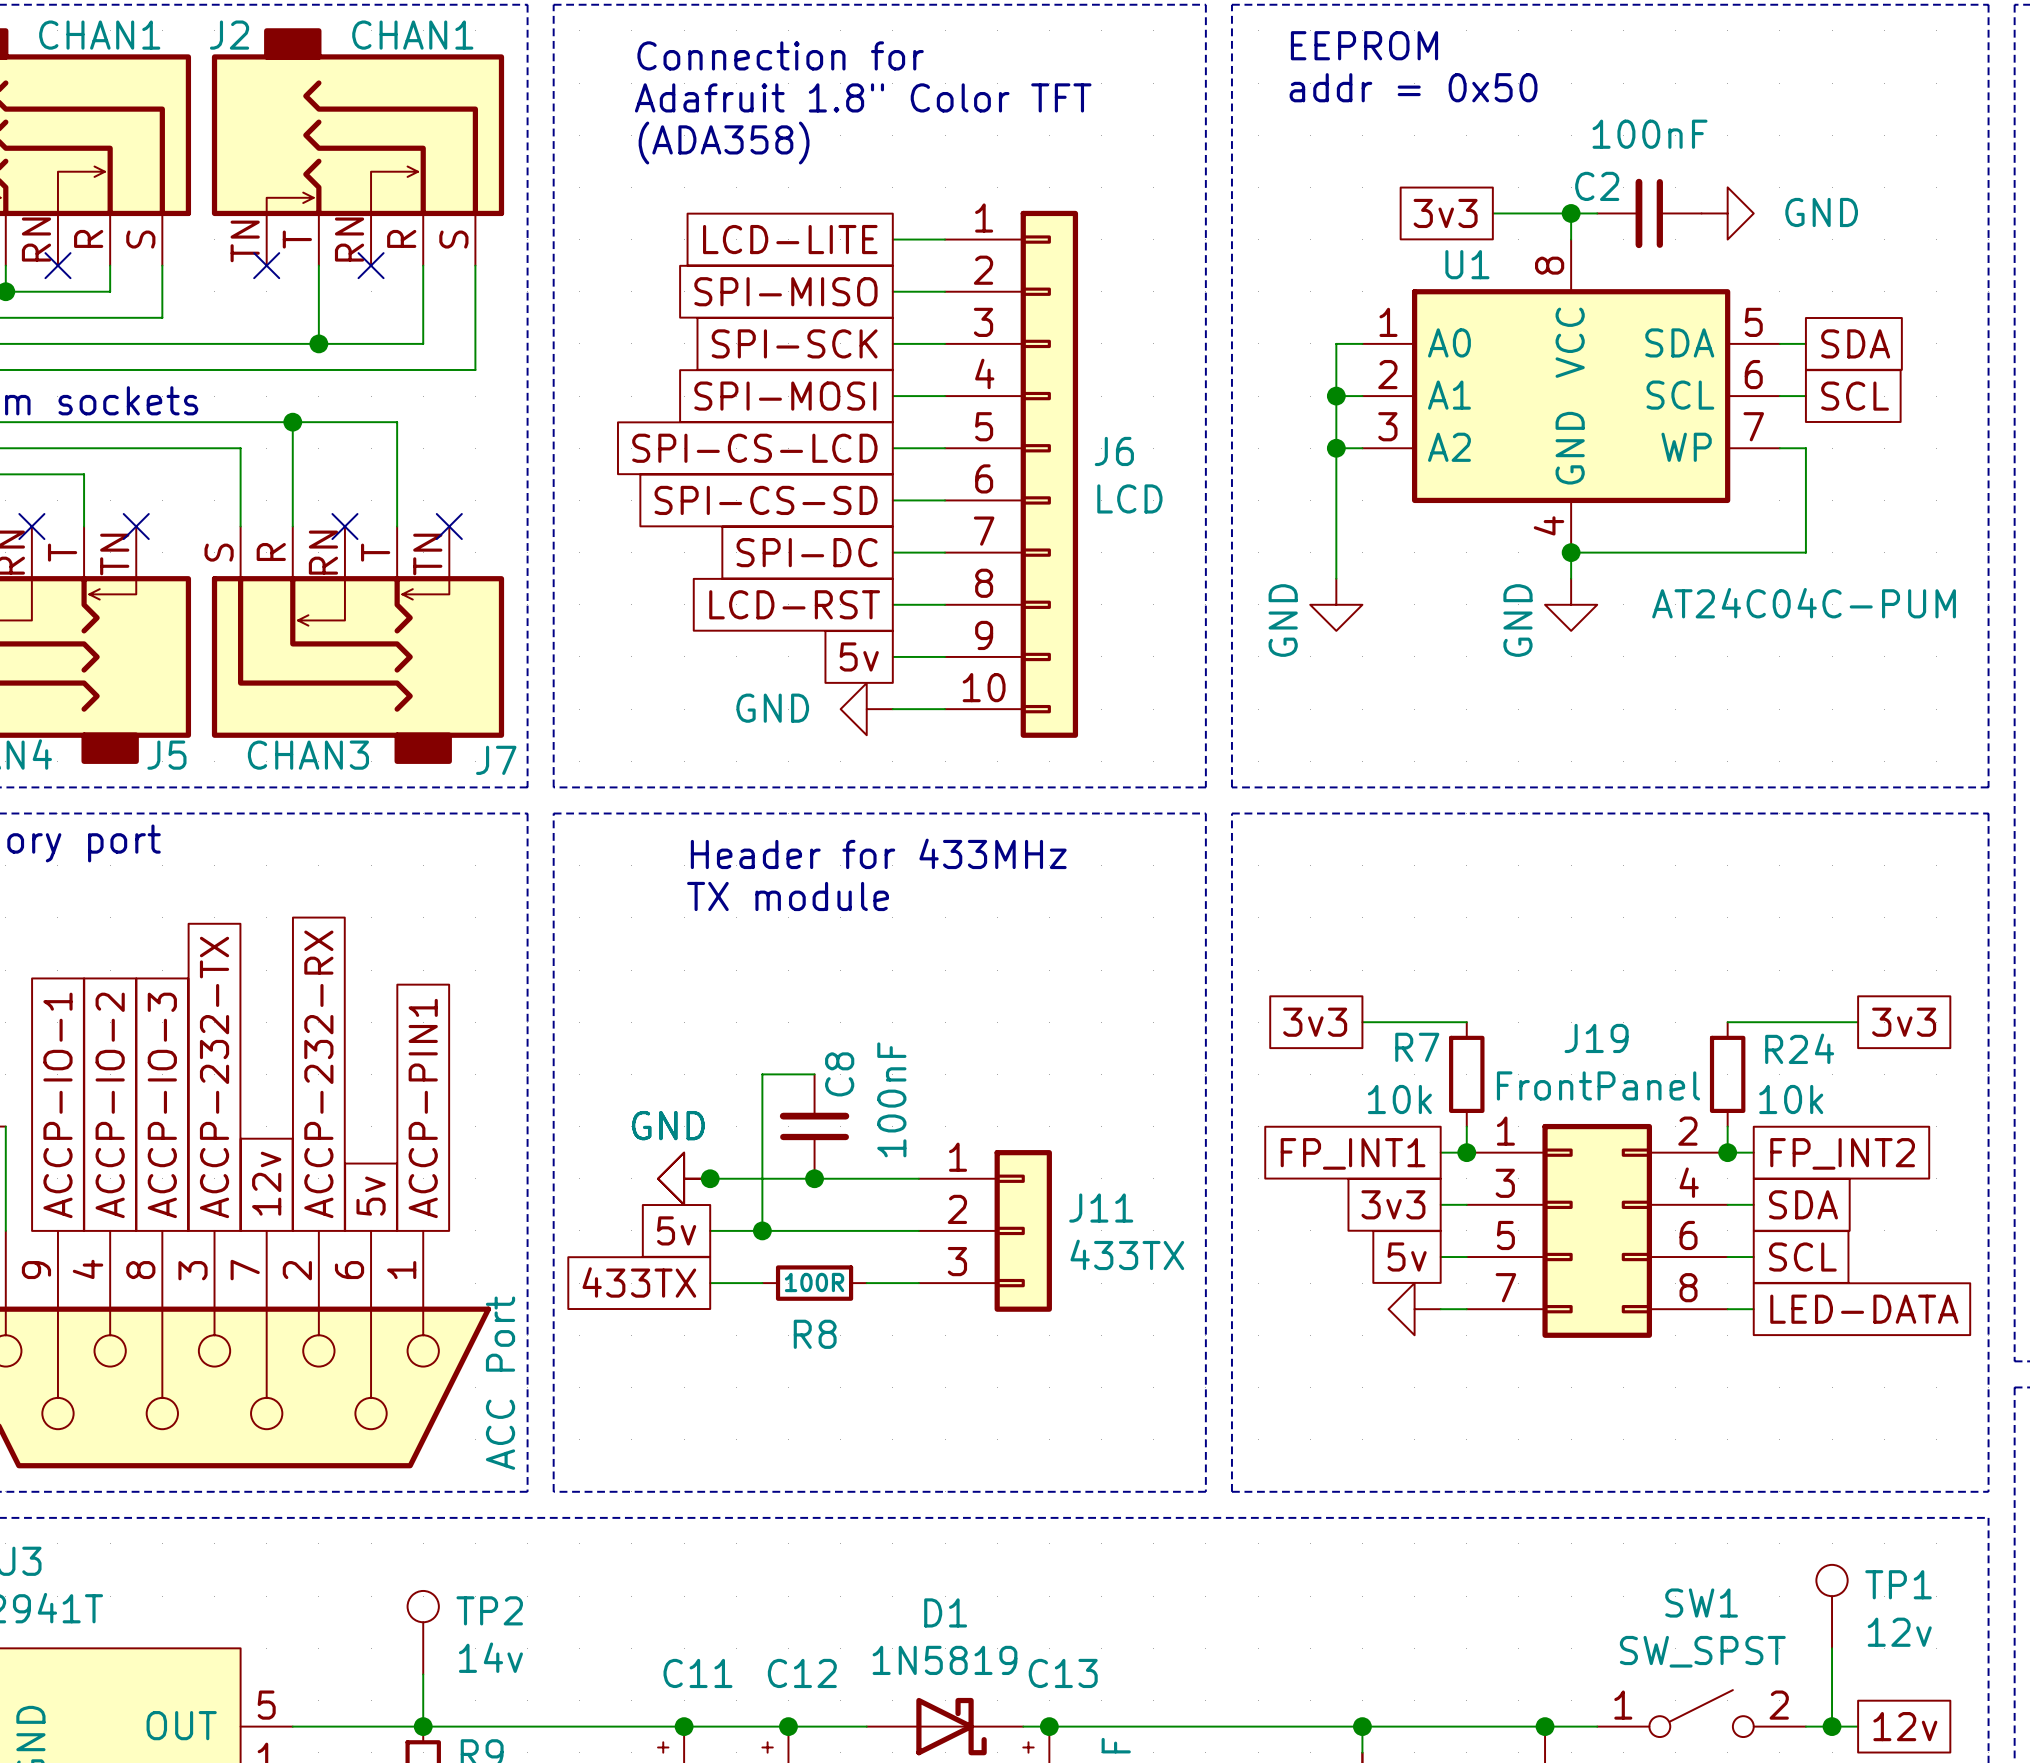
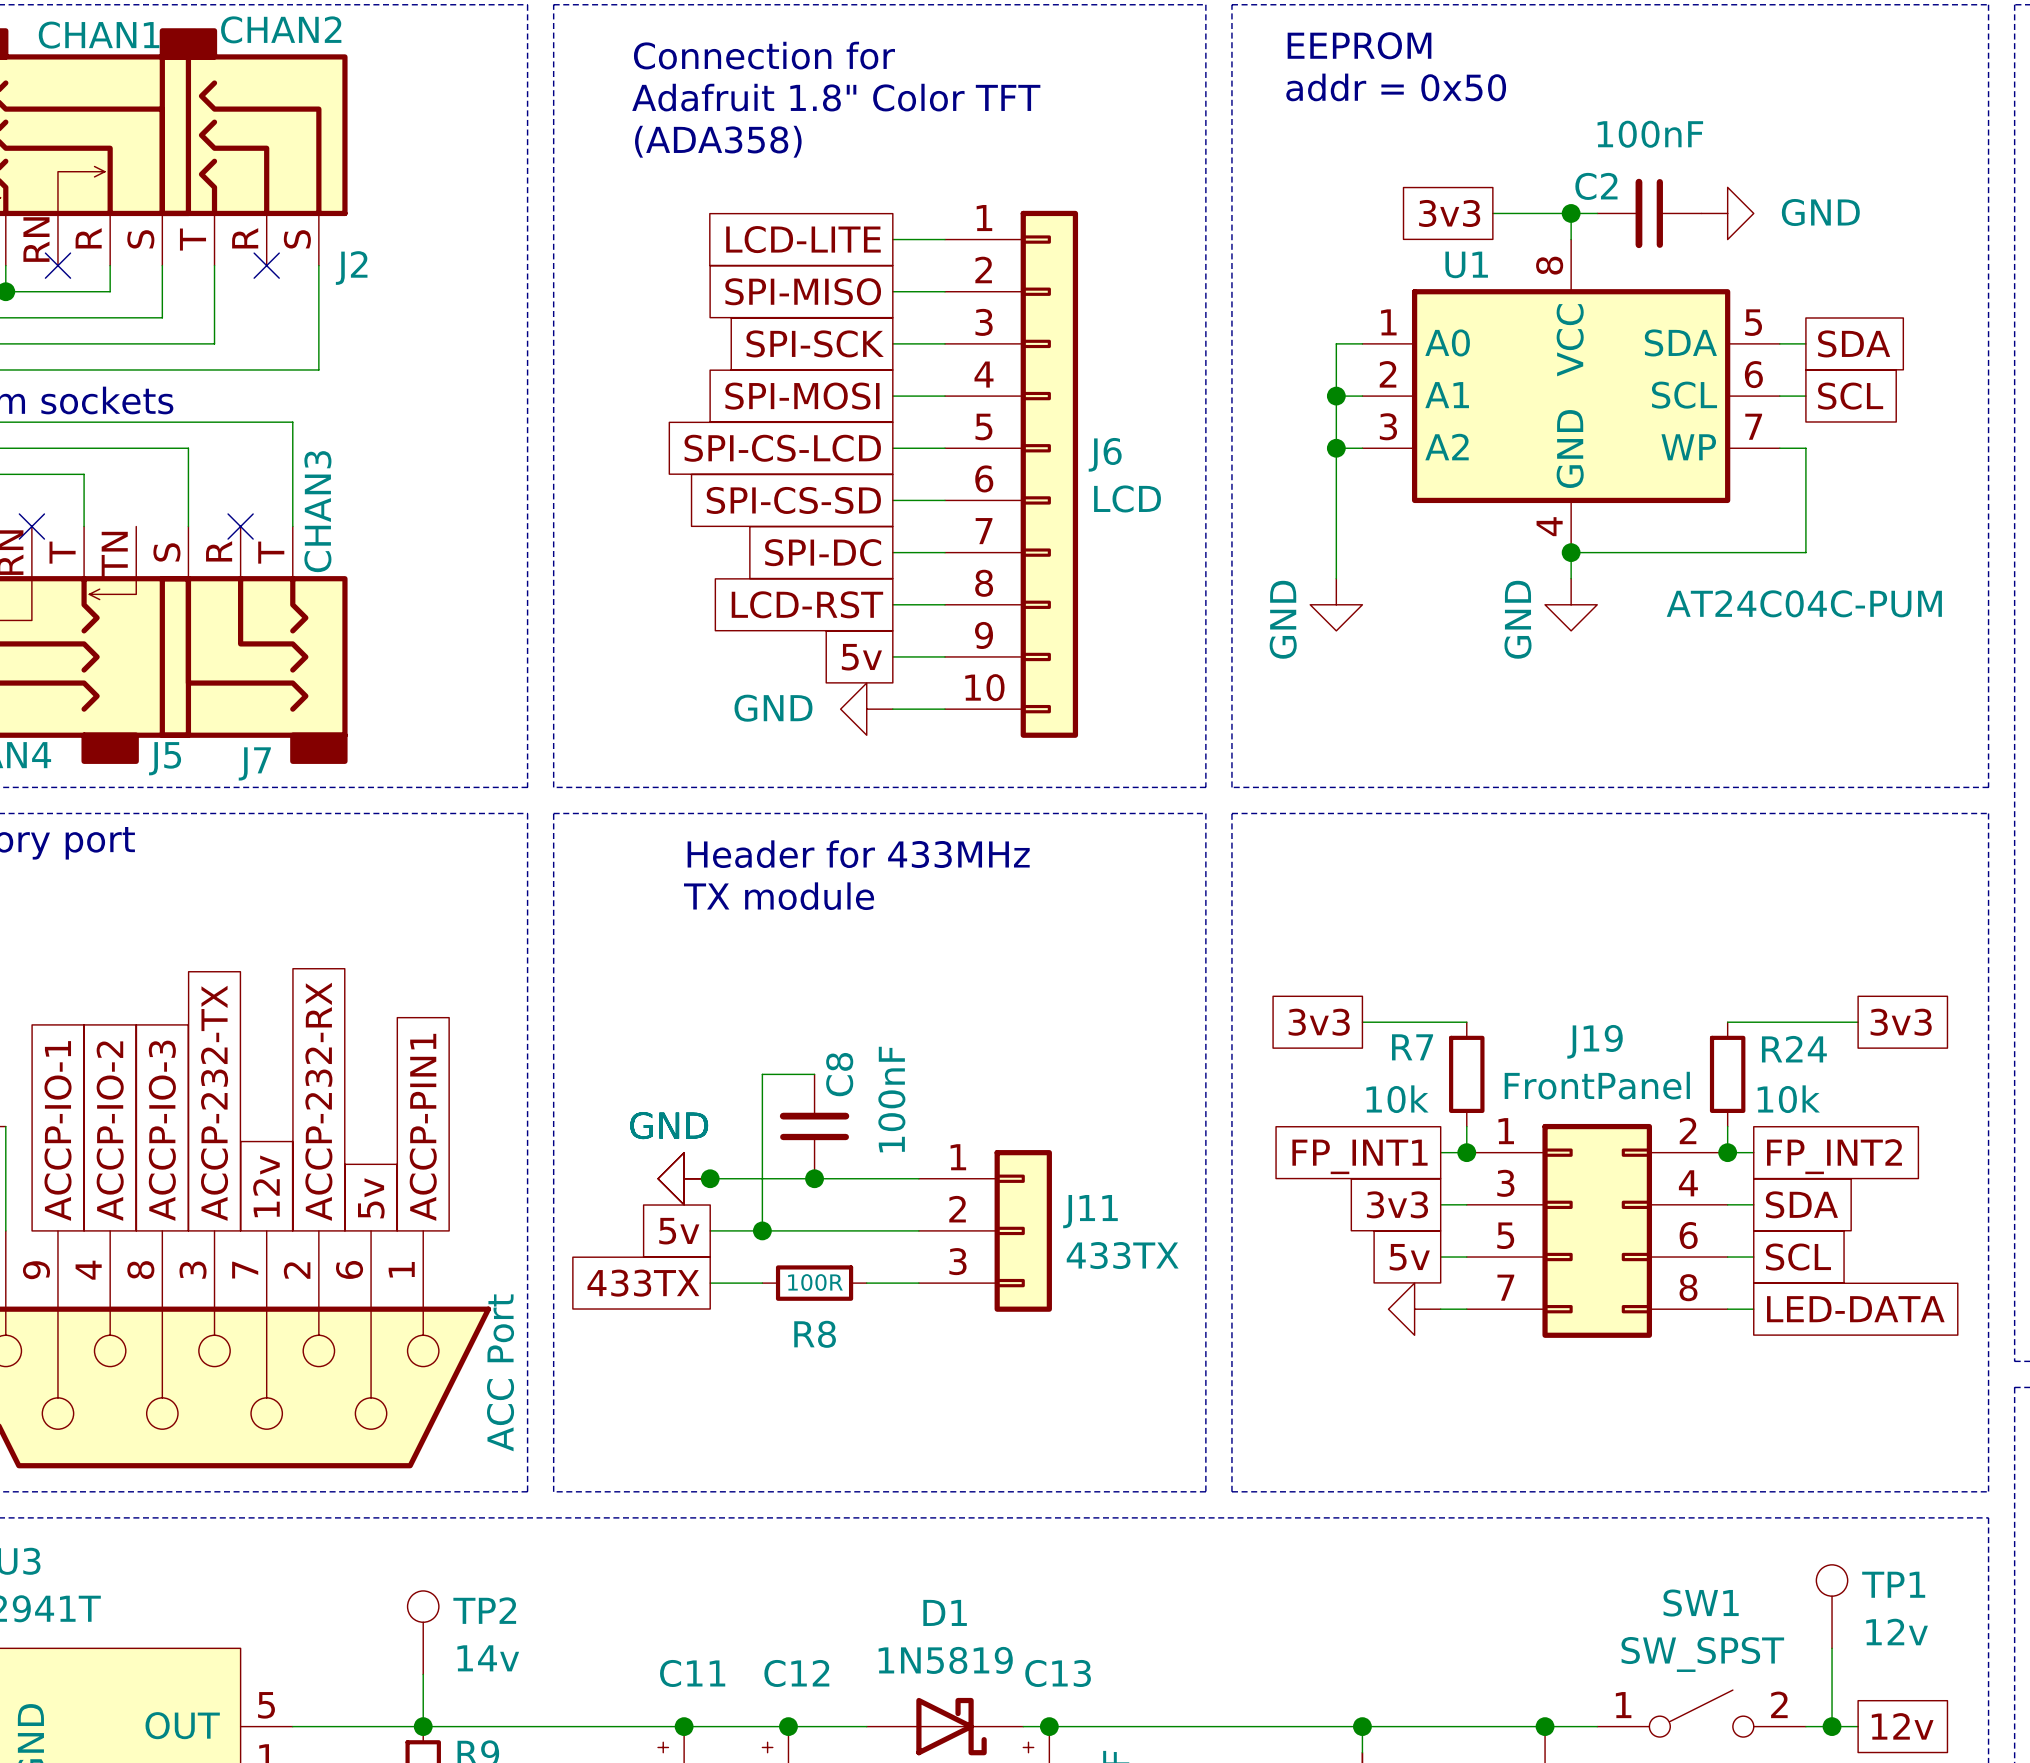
J2 symbol: [211, 28, 505, 266] -> [159, 28, 348, 266]
J2 name position: J2 (229, 35) -> J2 (351, 268)
J2 value: CHAN1 (412, 35) -> CHAN2 (281, 29)
no-connect mark: (371, 265) -> none
wire: (423, 265) (423, 343) (214, 343) -> (214, 265) (214, 343)
wire: (475, 265) (475, 369) (318, 369) -> (318, 343) (318, 369)
junction: (318, 343) -> none
wire: (292, 422) (397, 422) (397, 526) -> none
junction: (292, 422) -> none
wire: (188, 448) (240, 448) (240, 526) -> (188, 448) (188, 526)
no-connect mark: (136, 526) -> none
J7 symbol: [211, 526, 505, 764] -> [159, 526, 348, 764]
no-connect mark: none -> (240, 526)
no-connect mark: (344, 526) -> none
no-connect mark: (449, 526) -> none
J7 value position: CHAN3 (308, 755) -> CHAN3 (317, 511)
J7 name position: J7 (496, 760) -> J7 (254, 763)

